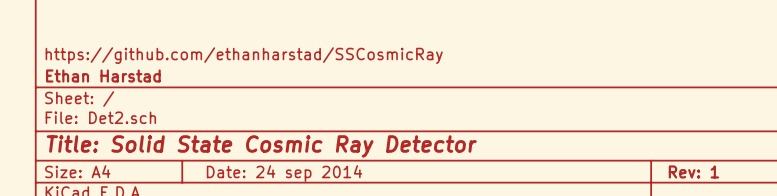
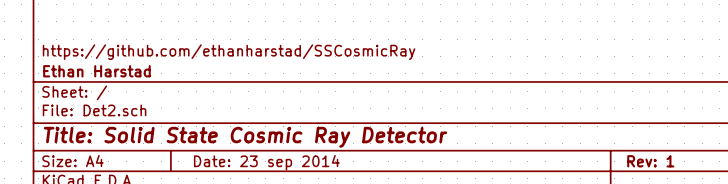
title block: Date: 24 sep 2014 (284, 173) -> Date: 23 sep 2014 (266, 162)

